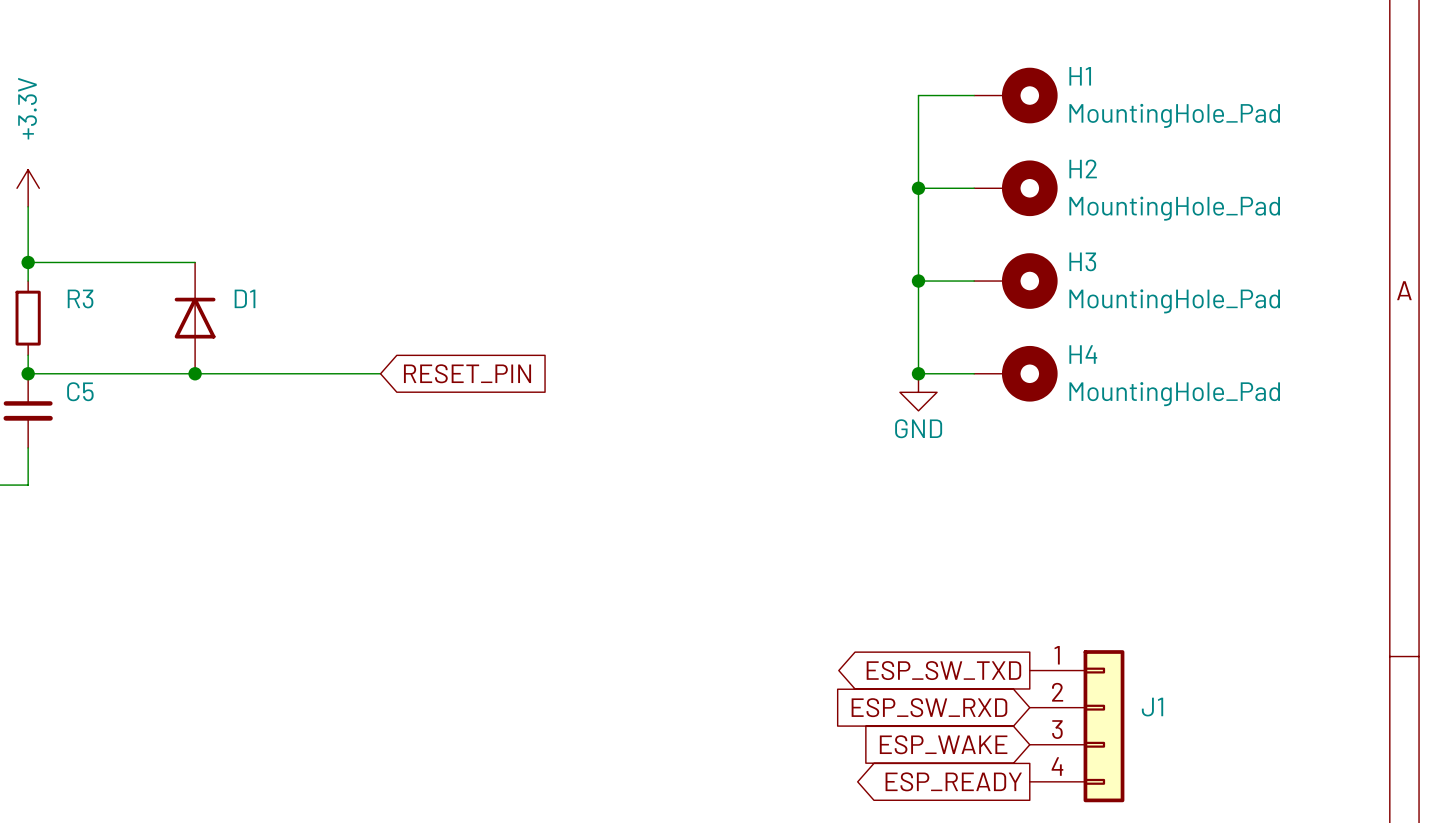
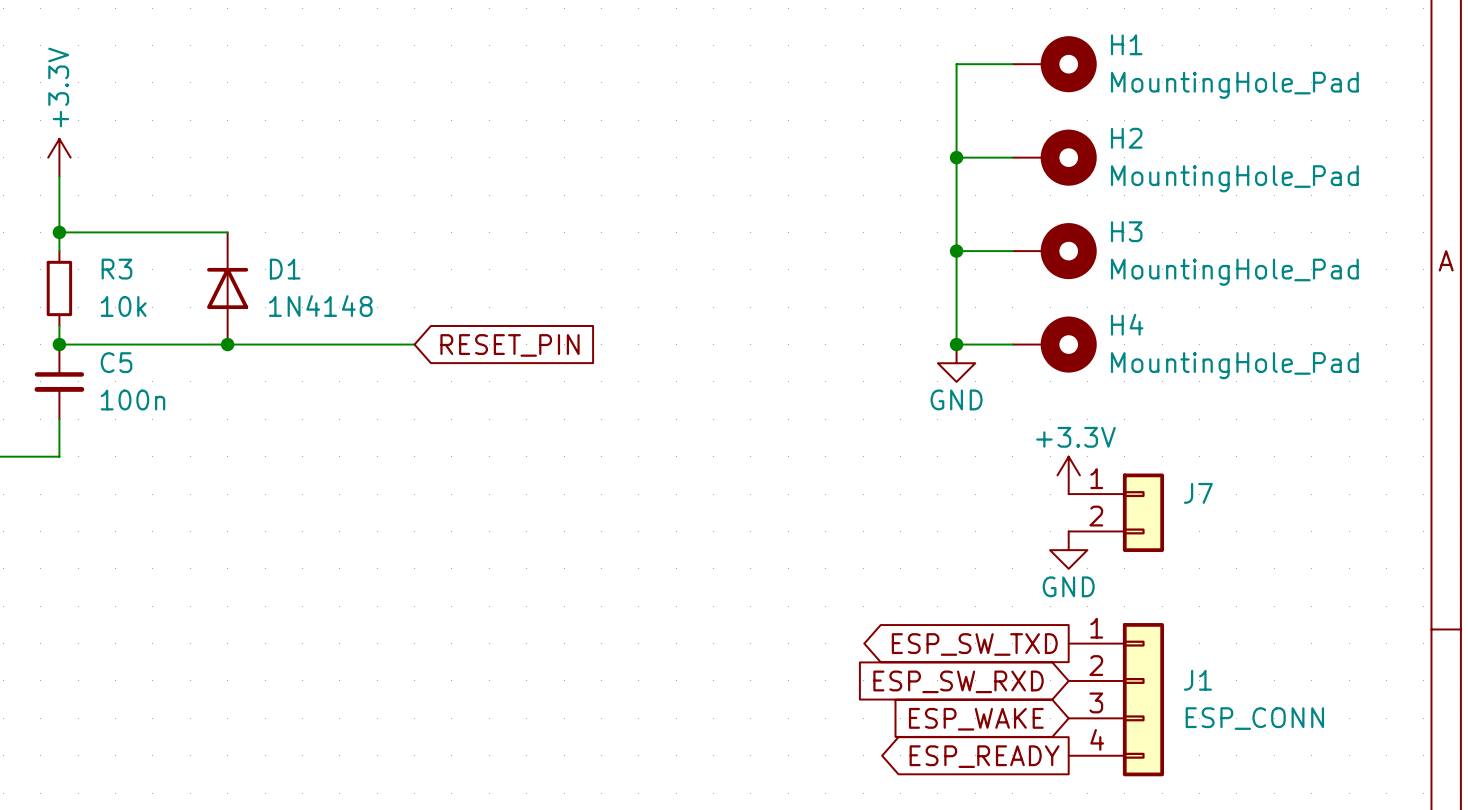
R3 value: none -> 10k (123, 306)
D1 value: none -> 1N4148 (320, 306)
C5 value: none -> 100n (132, 400)
power symbol: none -> +3.3V (1068, 475)
J7: none -> (1116, 512)
power symbol: none -> GND (1068, 550)
J1 value: none -> ESP_CONN (1254, 718)

